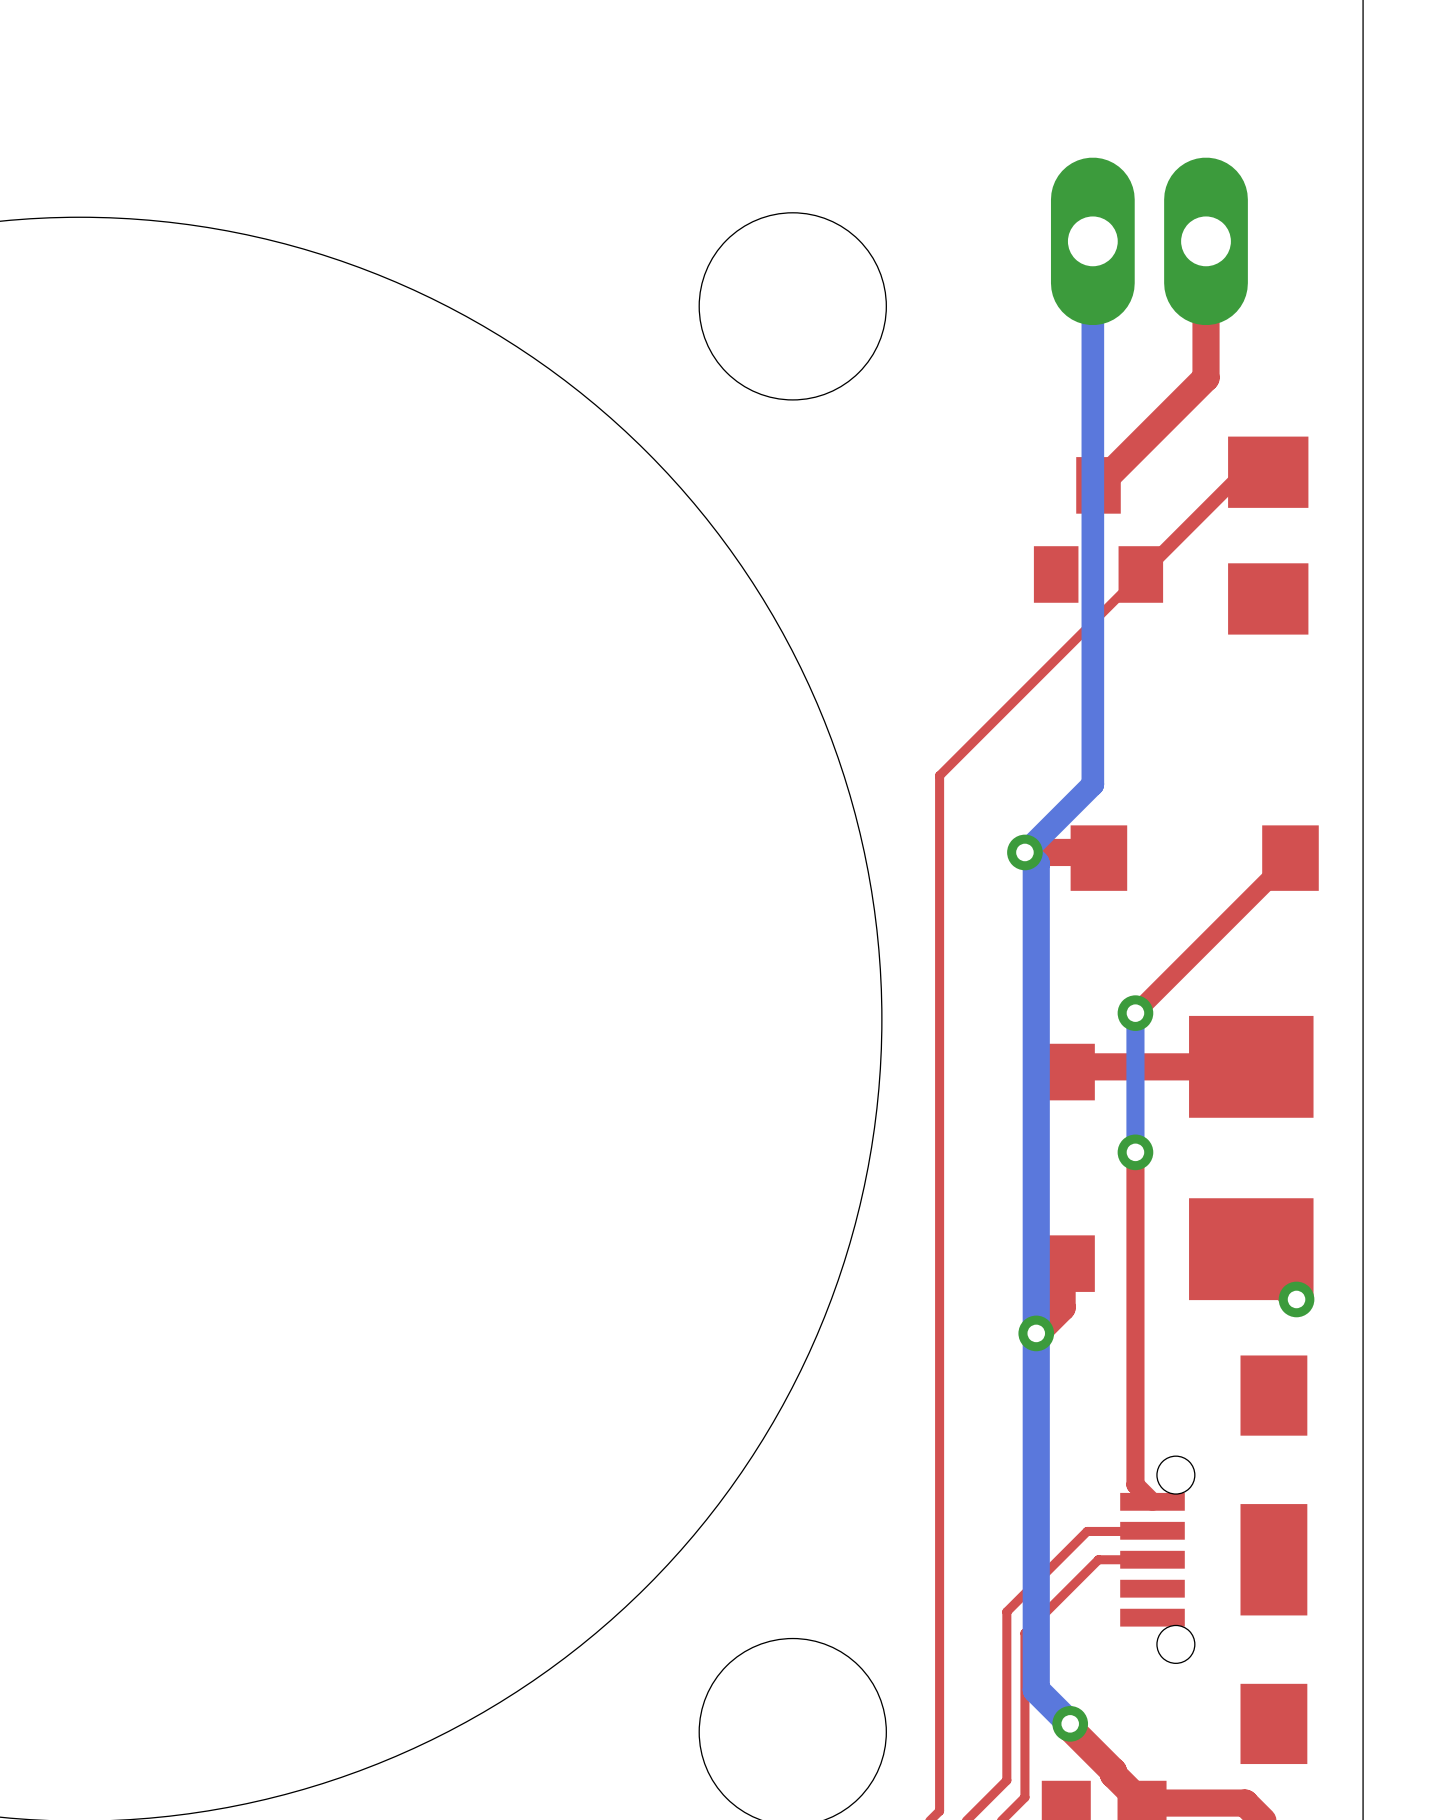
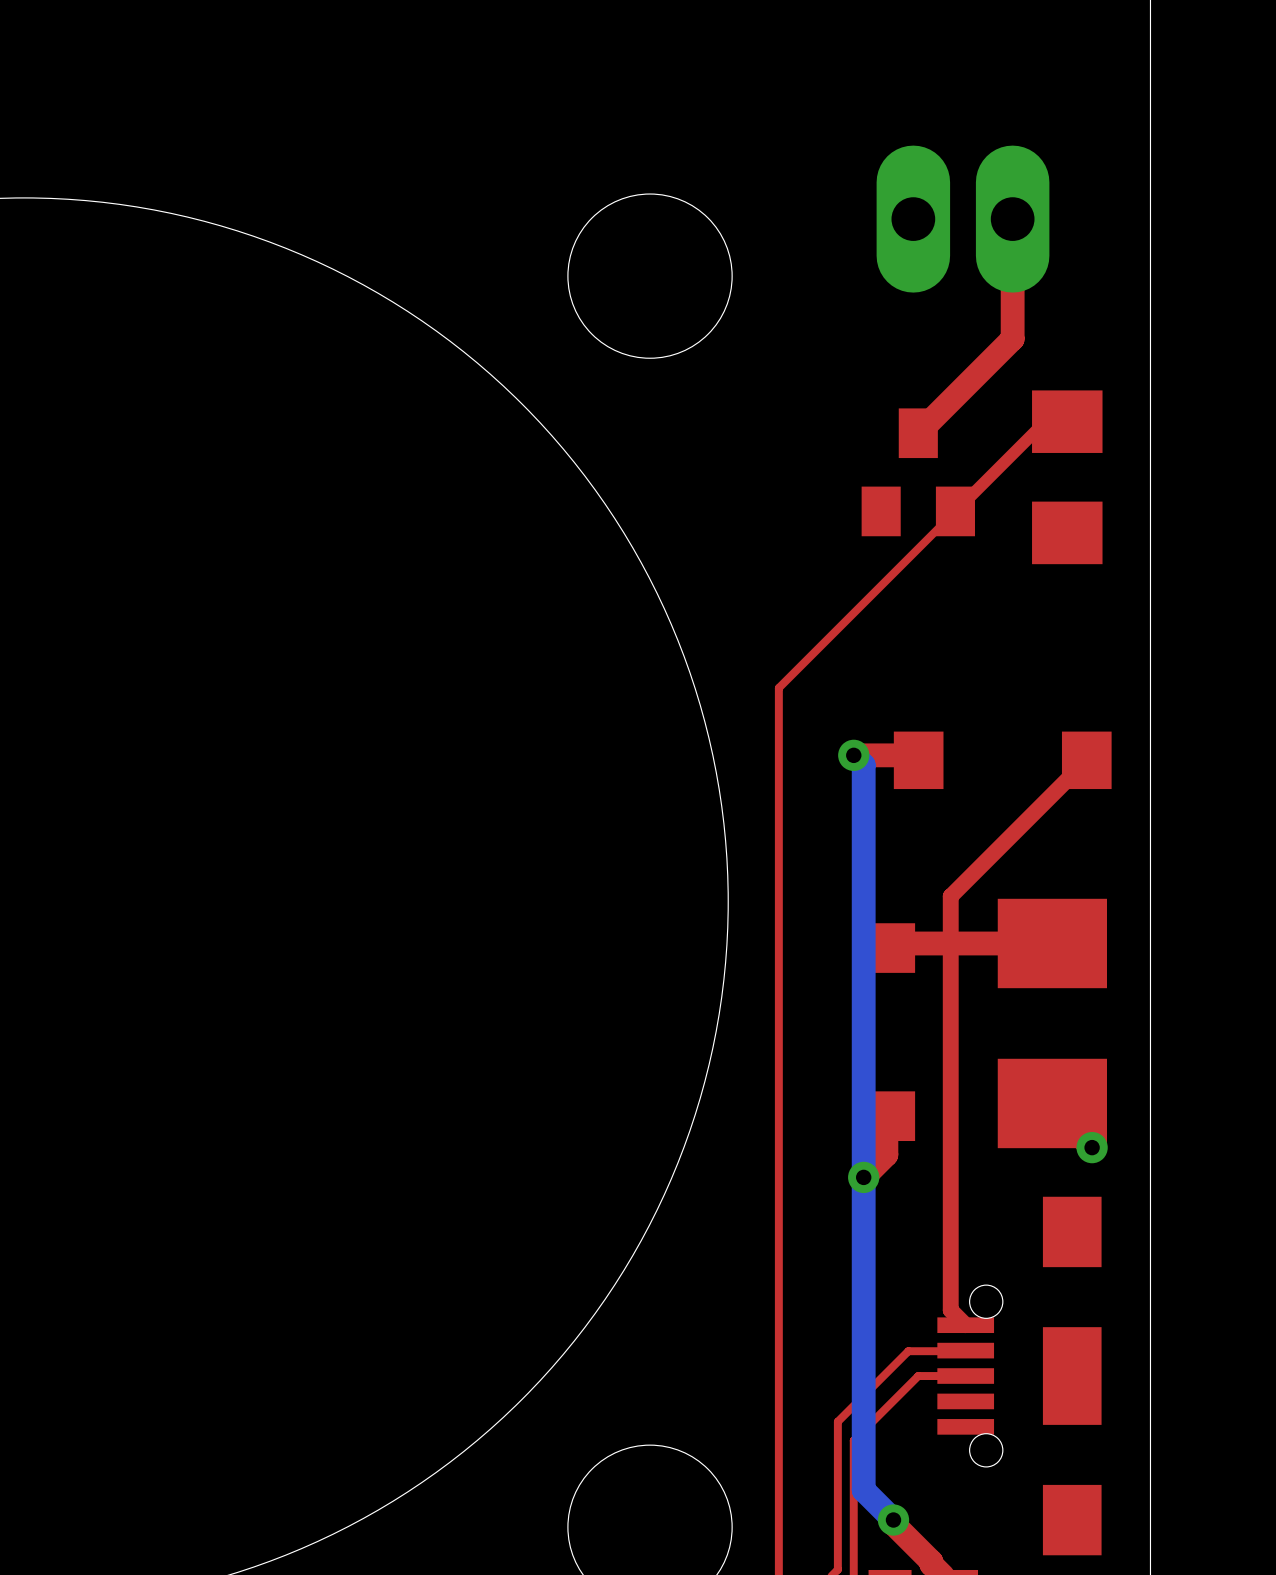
bottom track: (1092, 241) (1092, 784) (1024, 852) -> none
top track: none -> (950, 896) (950, 1018)
bottom track: (1135, 1013) (1135, 1152) -> none
via: (1135, 1013) -> none
via: (1135, 1152) -> none

